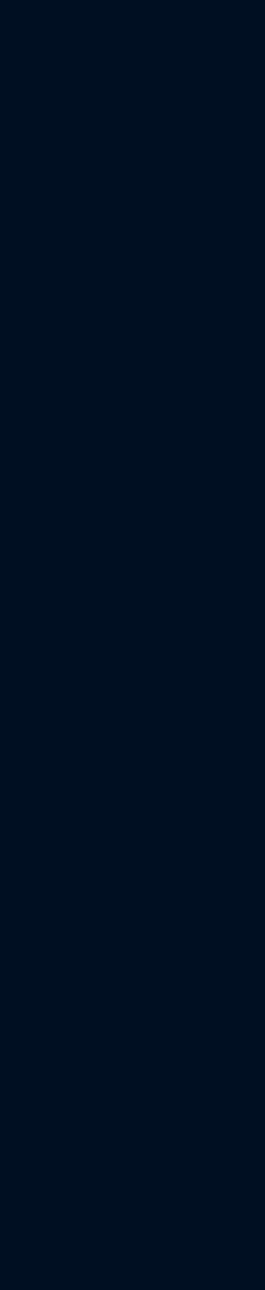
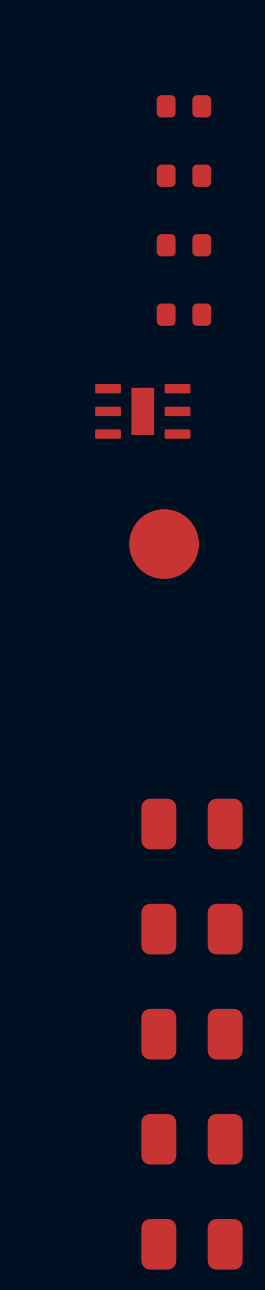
part: none -> (183, 106)
part: none -> (183, 175)
part: none -> (183, 245)
part: none -> (183, 314)
part: none -> (142, 411)
part: none -> (164, 544)
part: none -> (191, 824)
part: none -> (191, 929)
part: none -> (191, 1034)
part: none -> (191, 1139)
part: none -> (191, 1244)

